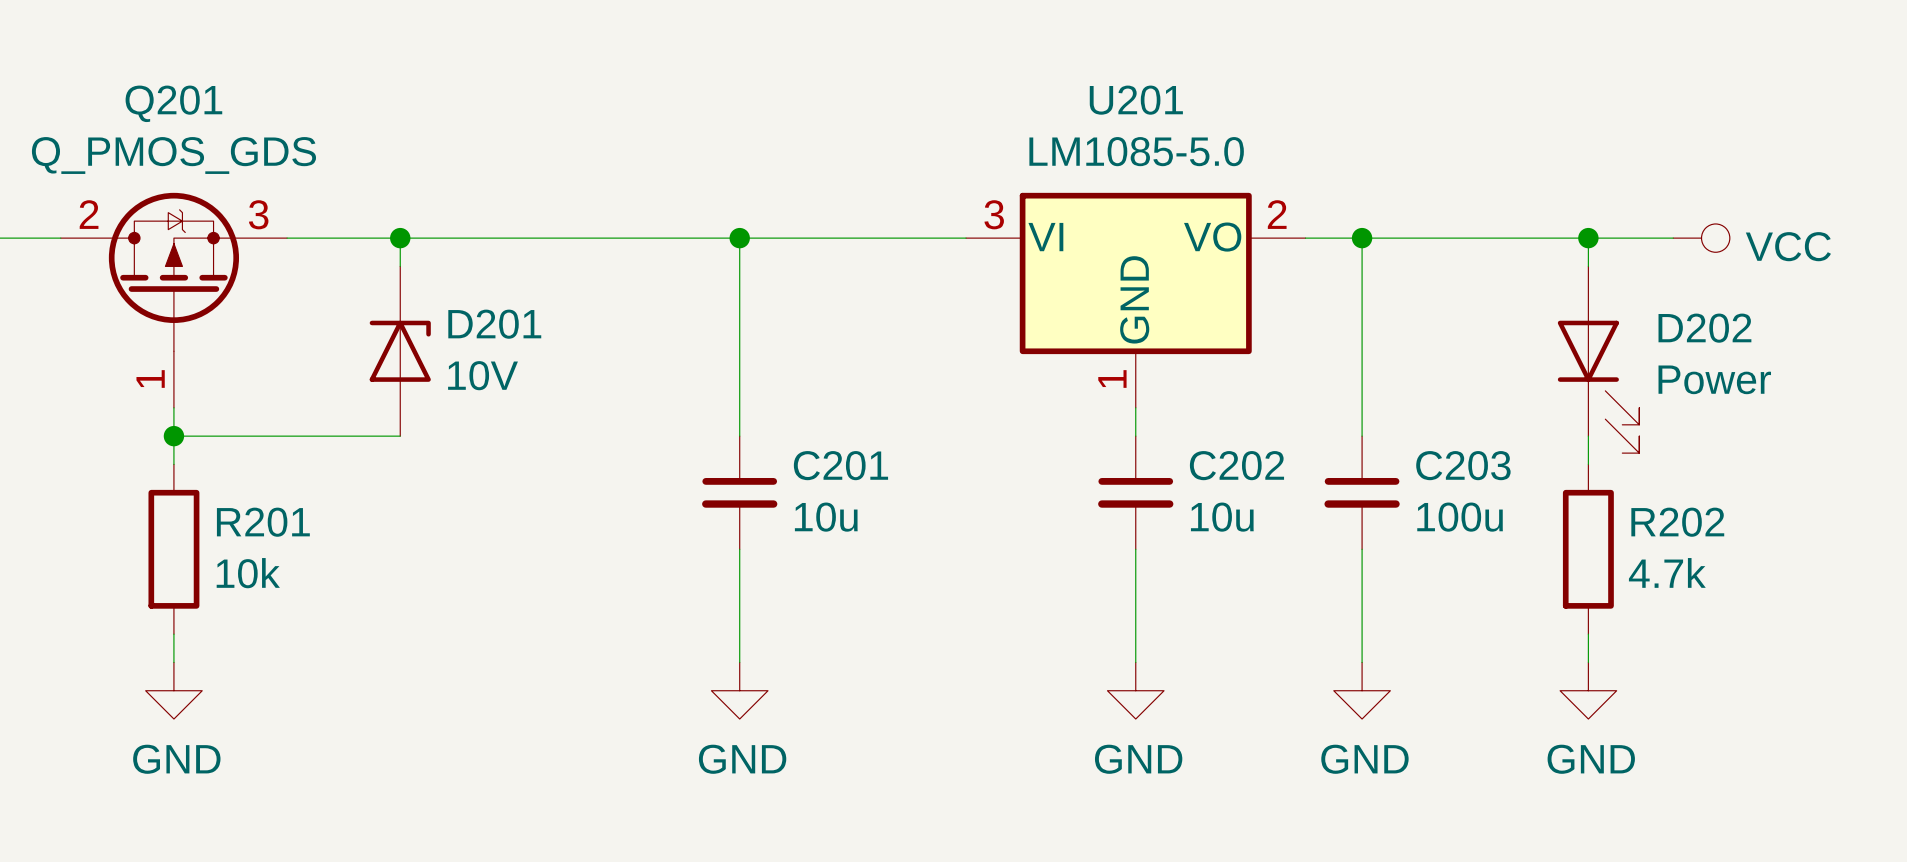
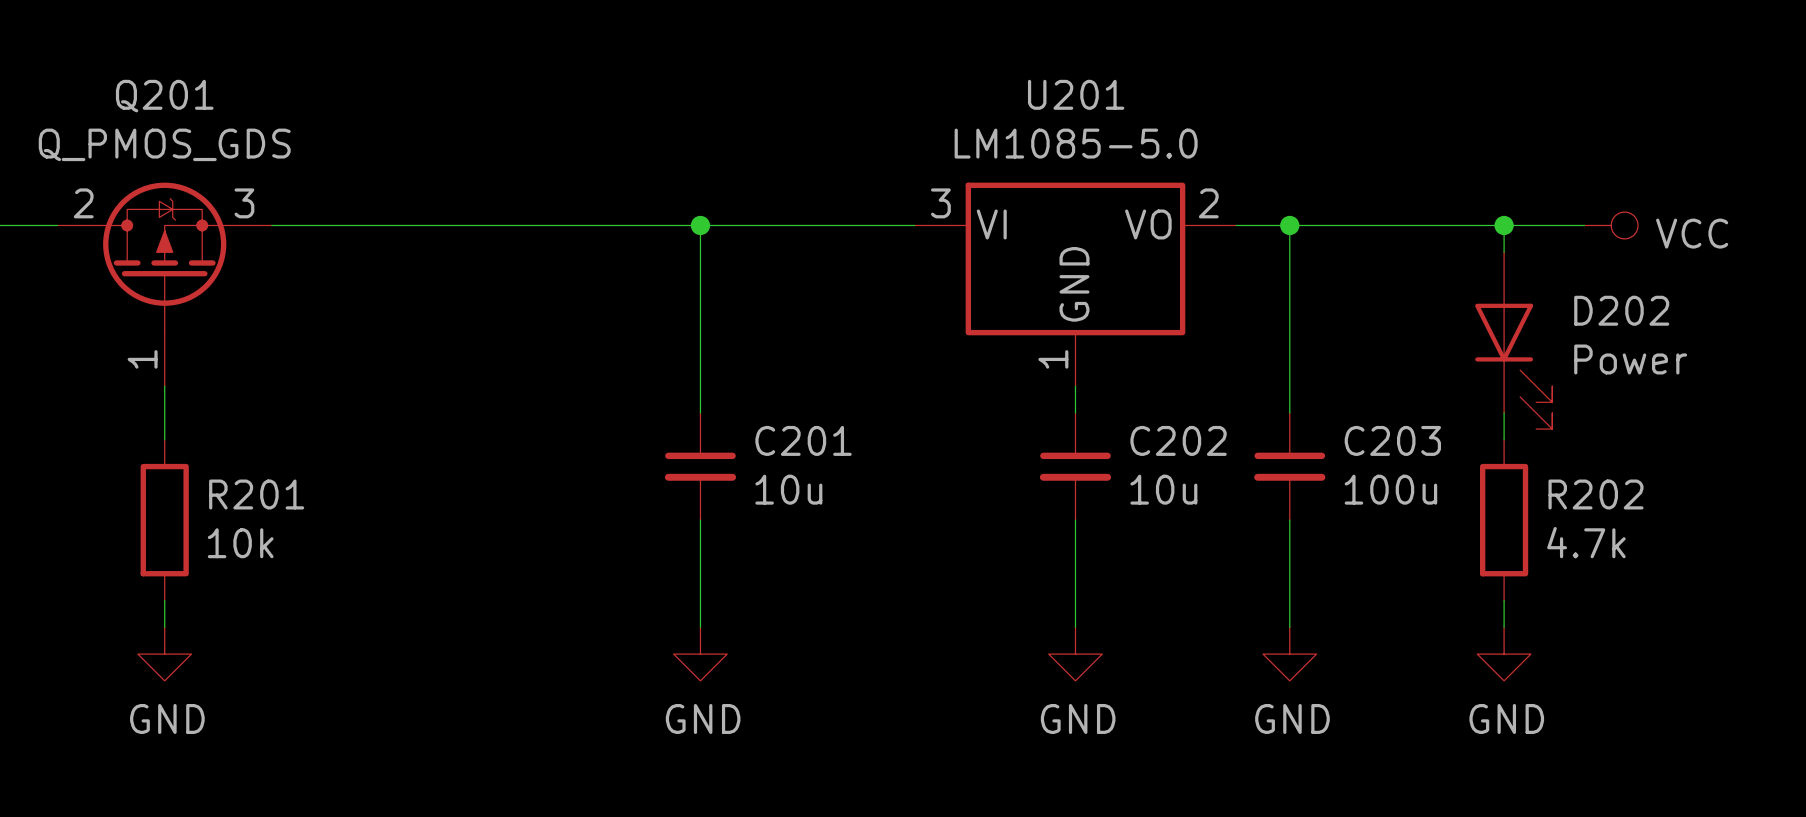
wire: (400, 238) (400, 266) -> none
junction: (400, 238) -> none
D201: 10V (400, 351) -> none
wire: (173, 436) (400, 436) -> none
junction: (173, 436) -> none

